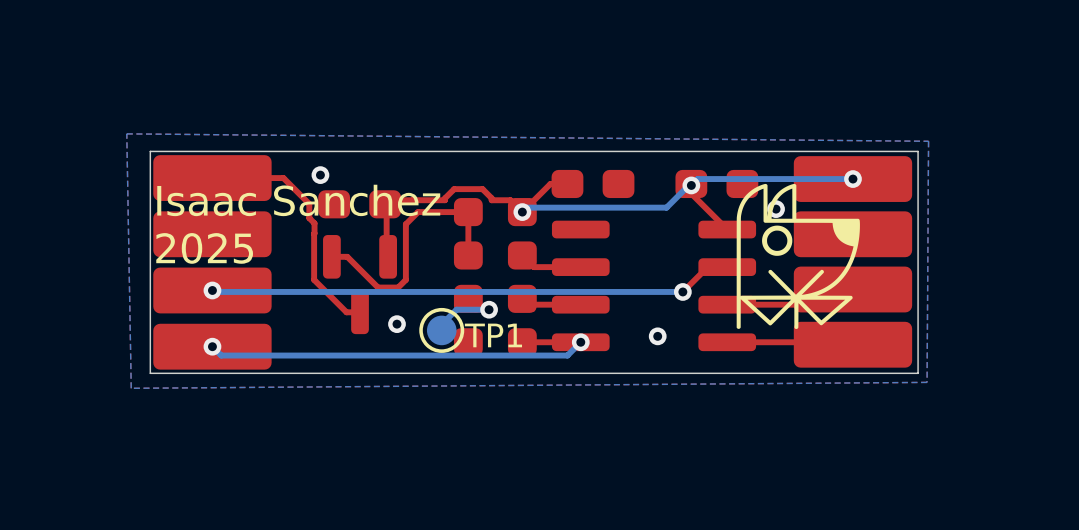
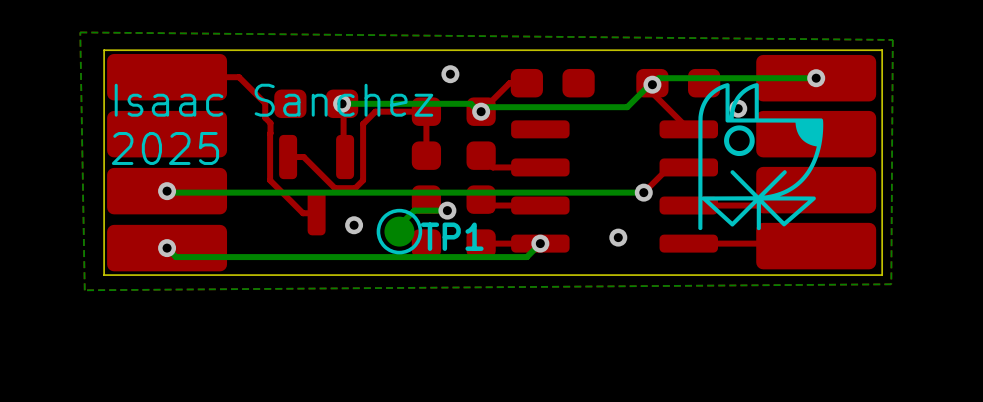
via position: (320, 175) -> (342, 103)
via: none -> (450, 74)
top track: (522, 202) (522, 212) (510, 200) (491, 200) (482, 189) (454, 189) (445, 200) (389, 200) (385, 204) -> none
bottom track: none -> (342, 103) (470, 103) (480, 113)

